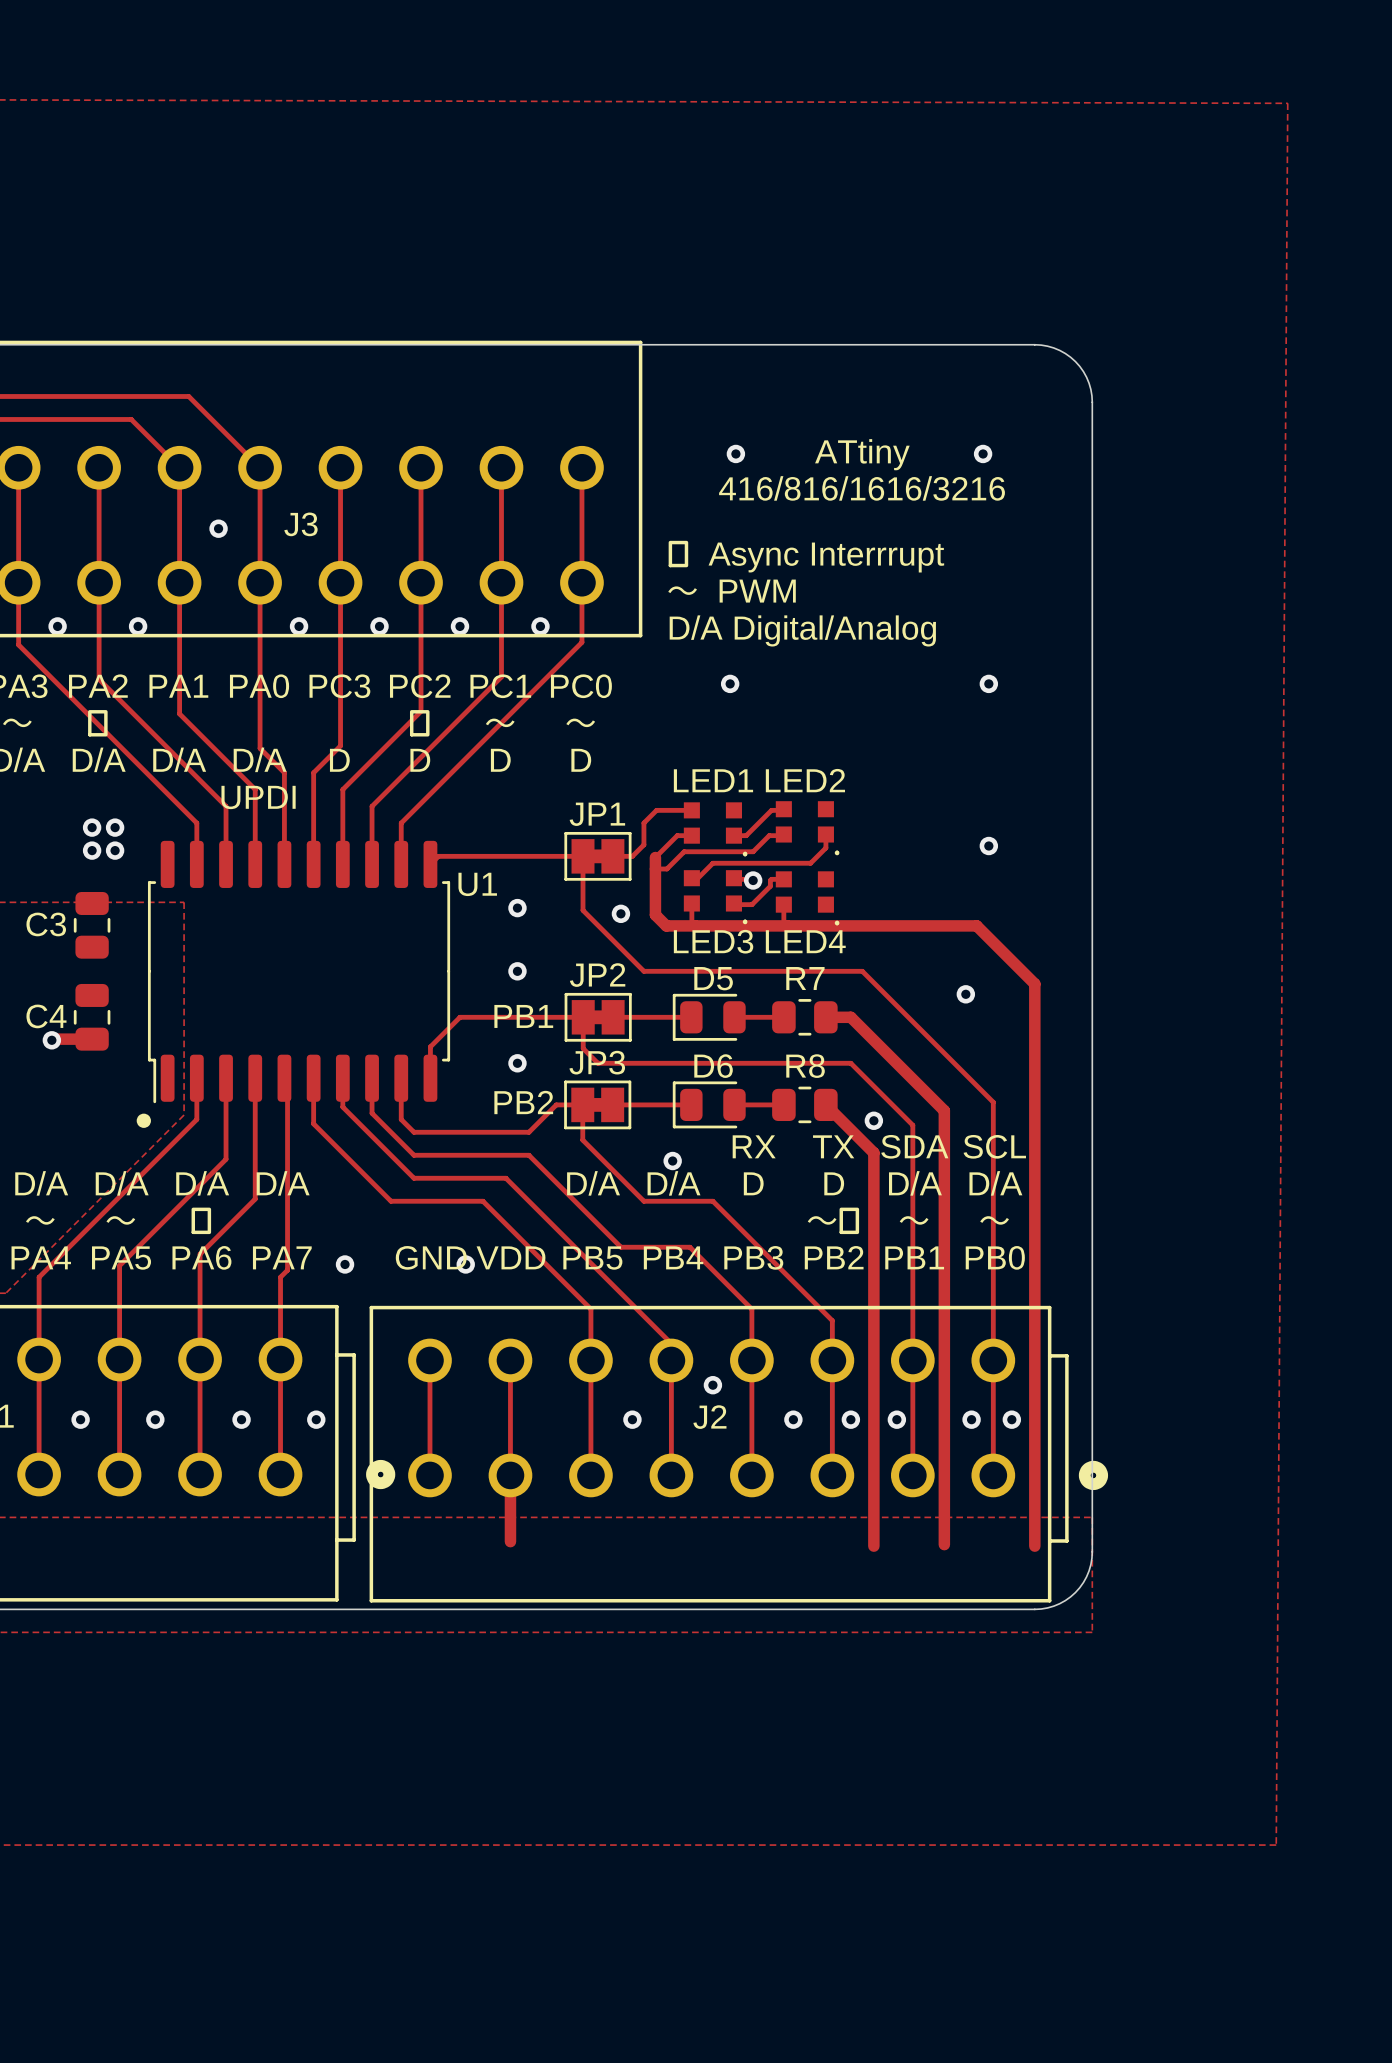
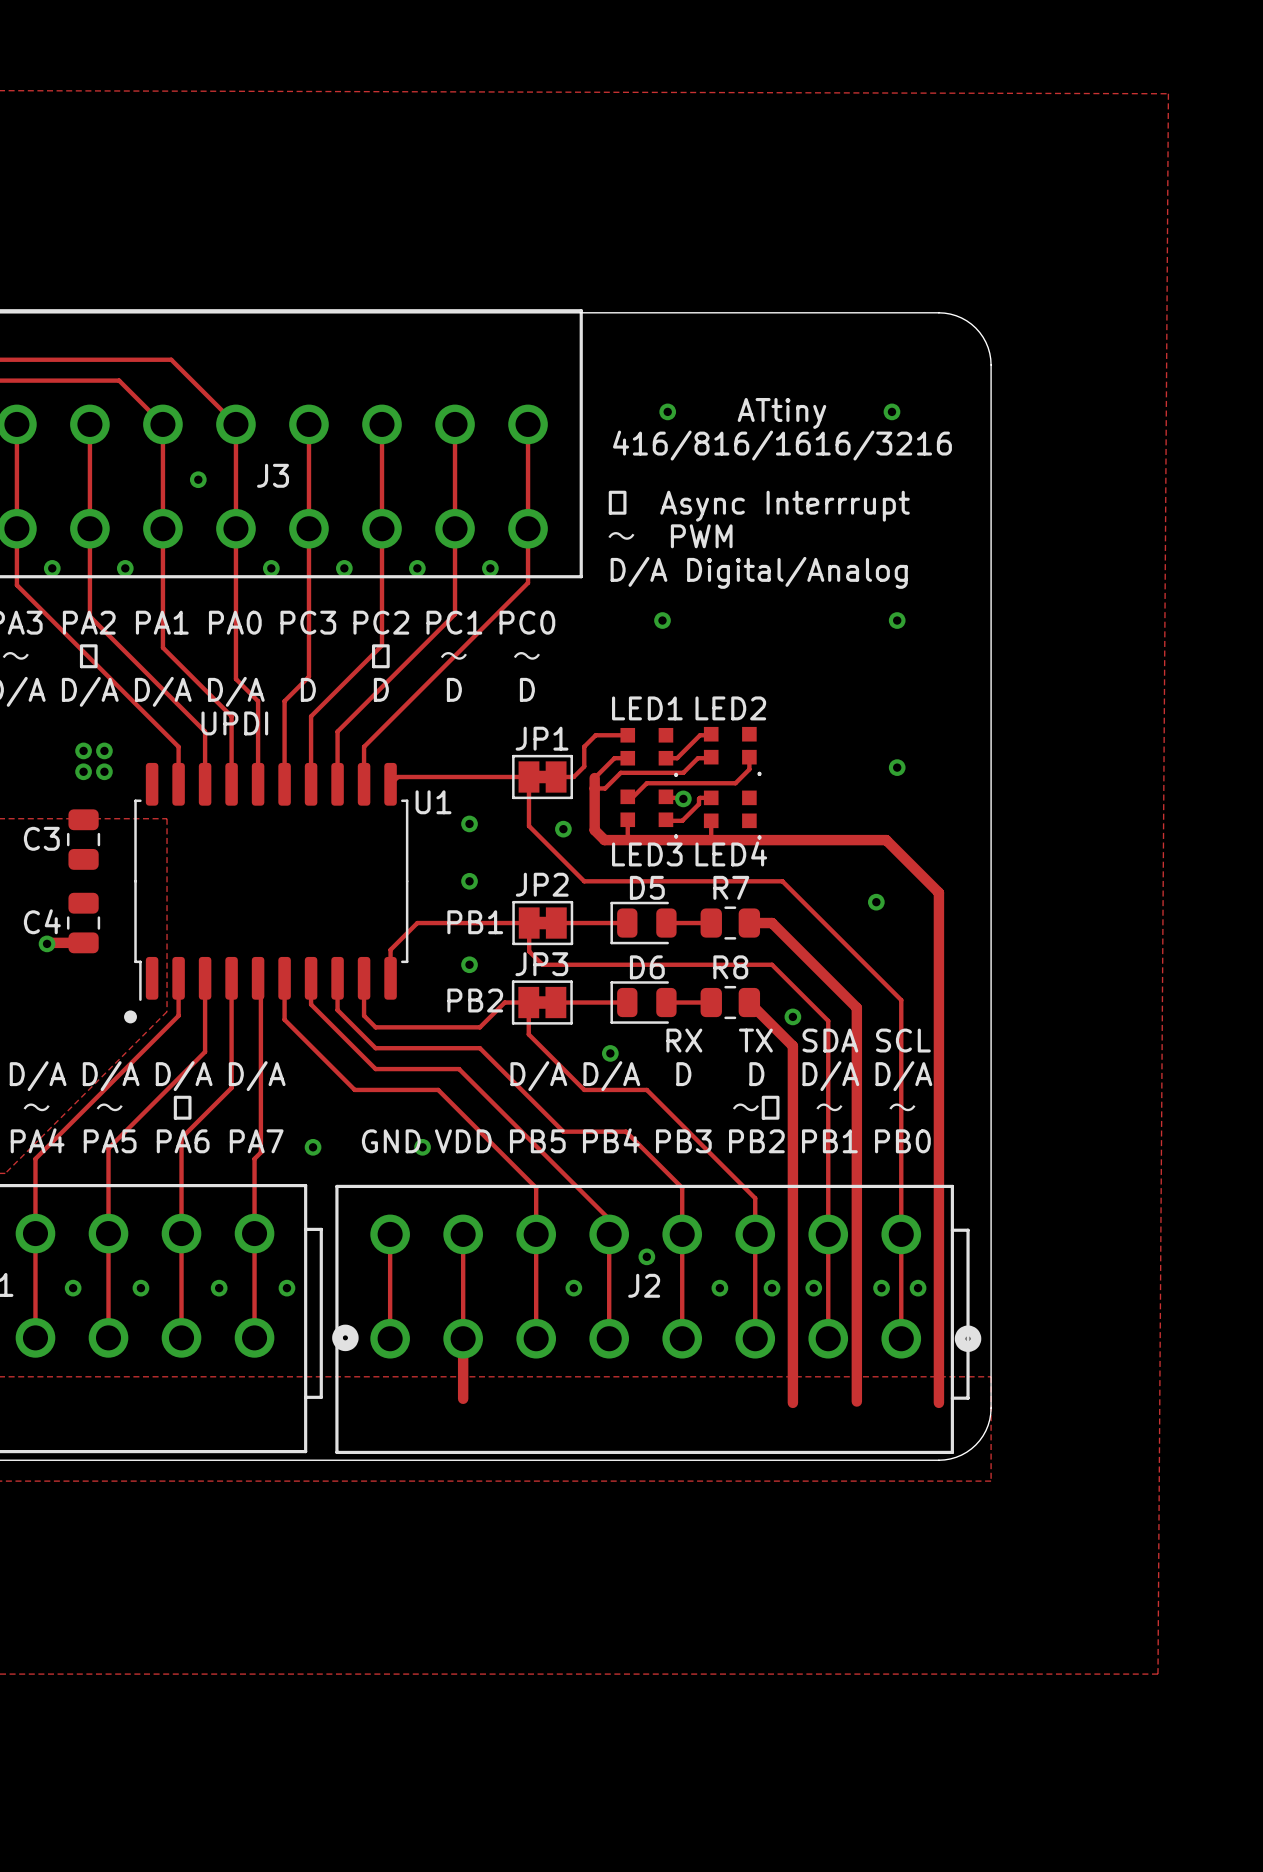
J2 footprint: [369, 1305, 1109, 1603] -> [335, 1184, 982, 1455]

